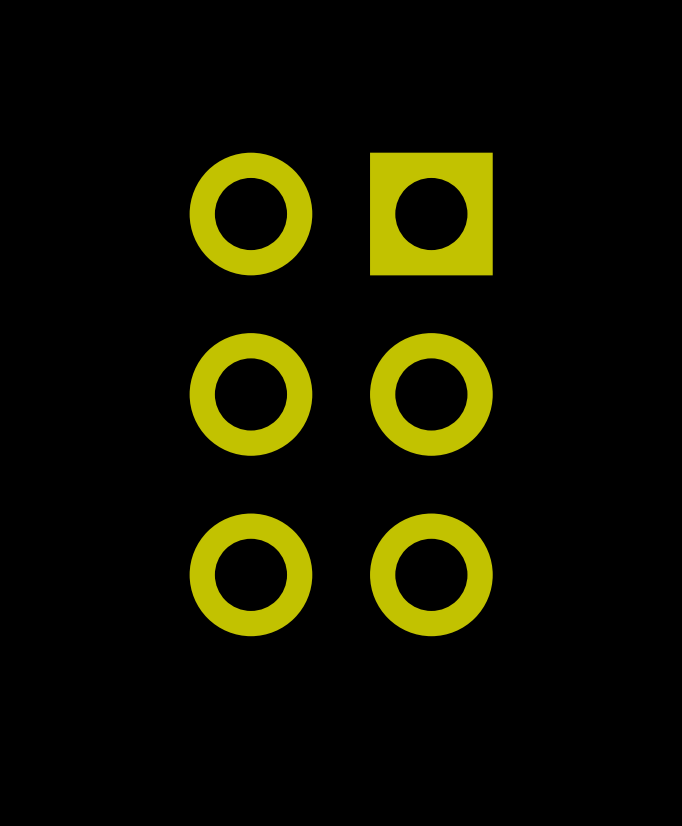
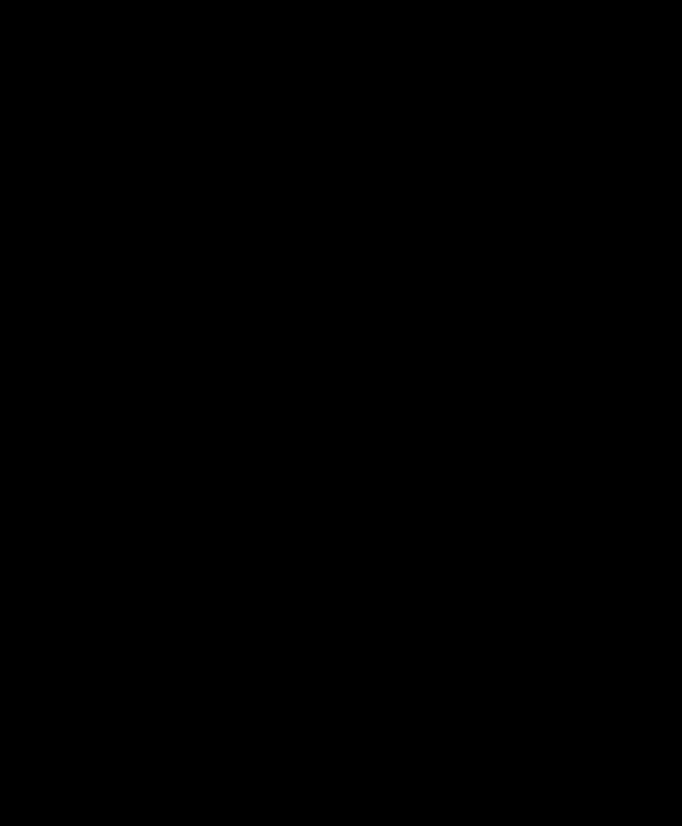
part: (341, 394) -> none

